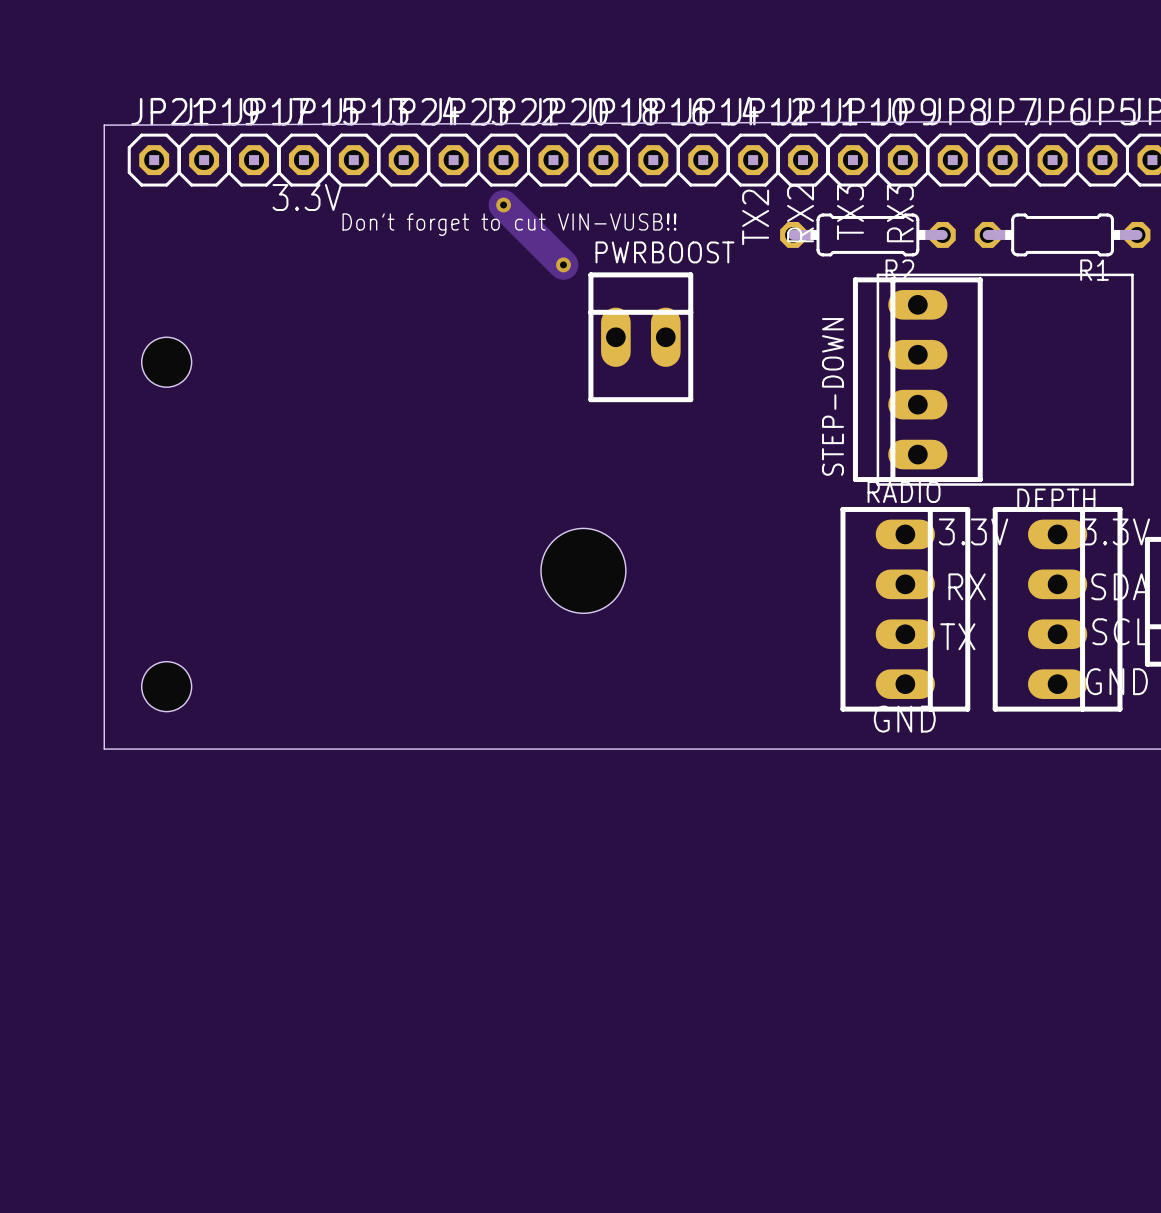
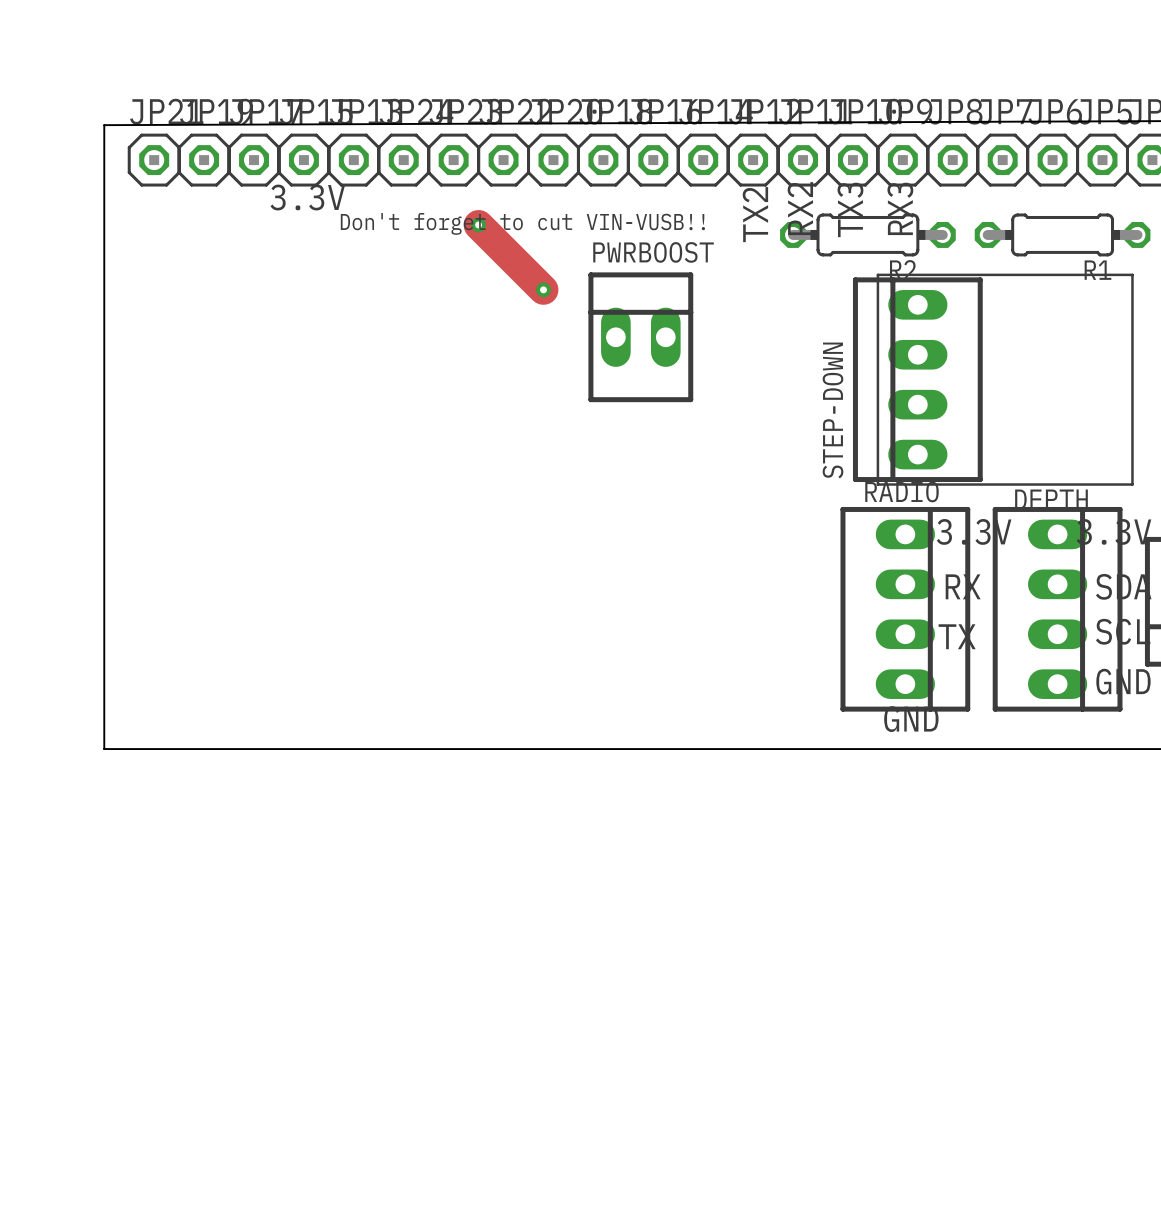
track: (503, 205) (563, 264) -> none
via position: (503, 205) -> (478, 224)
track: none -> (478, 224) (543, 289)
via position: (563, 264) -> (543, 289)
hole: (166, 362) -> none
hole: (583, 570) -> none
hole: (166, 686) -> none

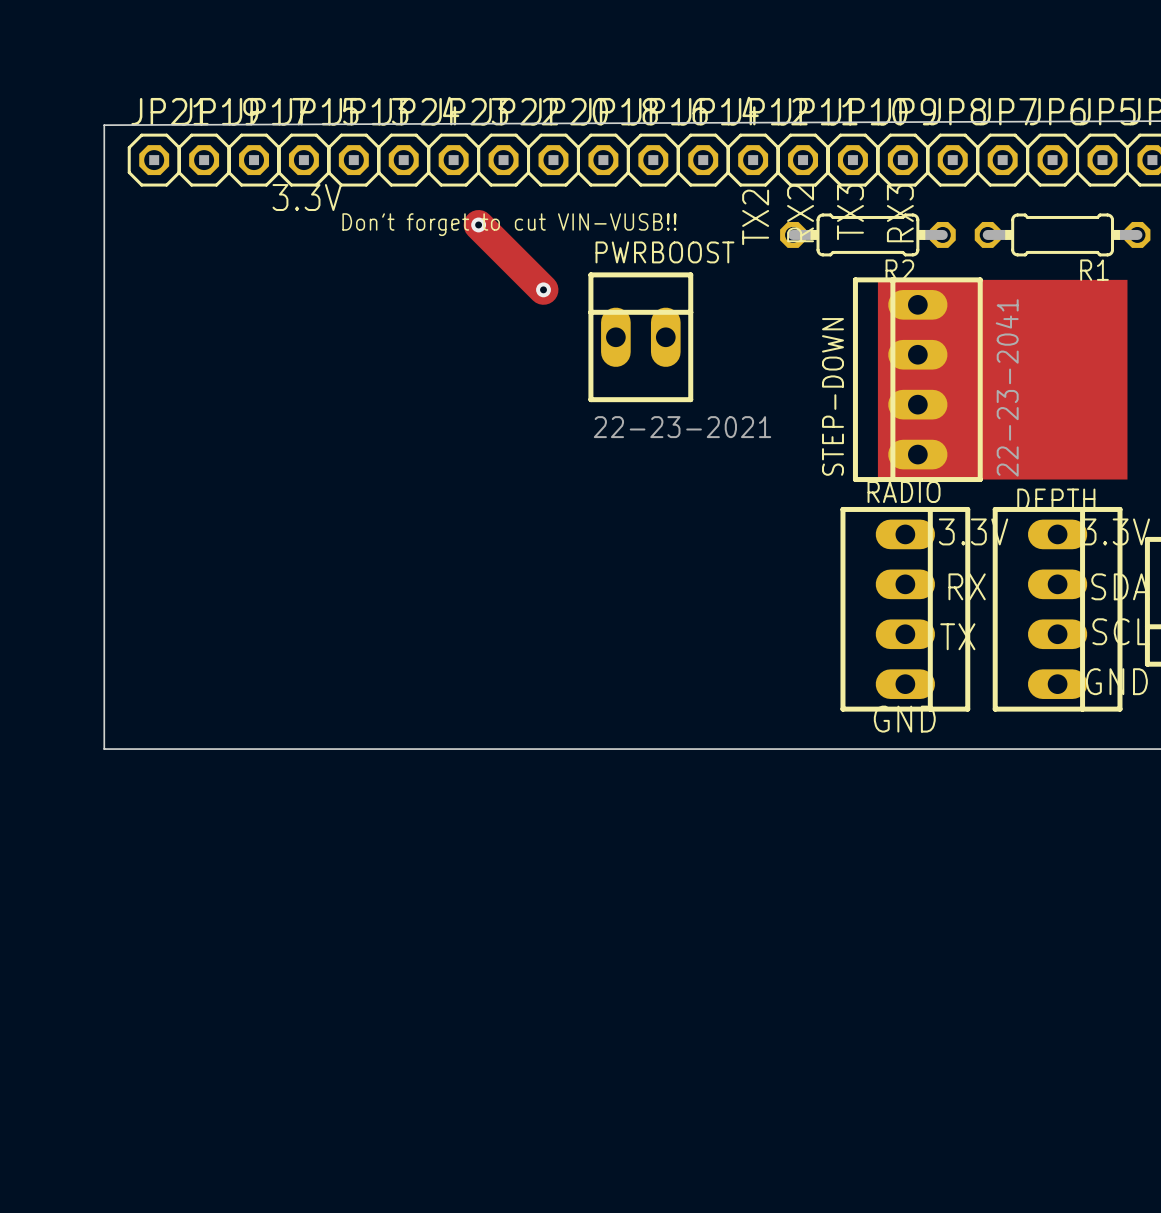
line: (877, 274) (1132, 274) (1132, 484) (877, 484) (877, 274) -> none
drawing: none -> [877, 279, 1128, 480]
STEP-DOWN value: none -> 22-23-2041 (1007, 387)
PWRBOOST value: none -> 22-23-2021 (682, 427)

